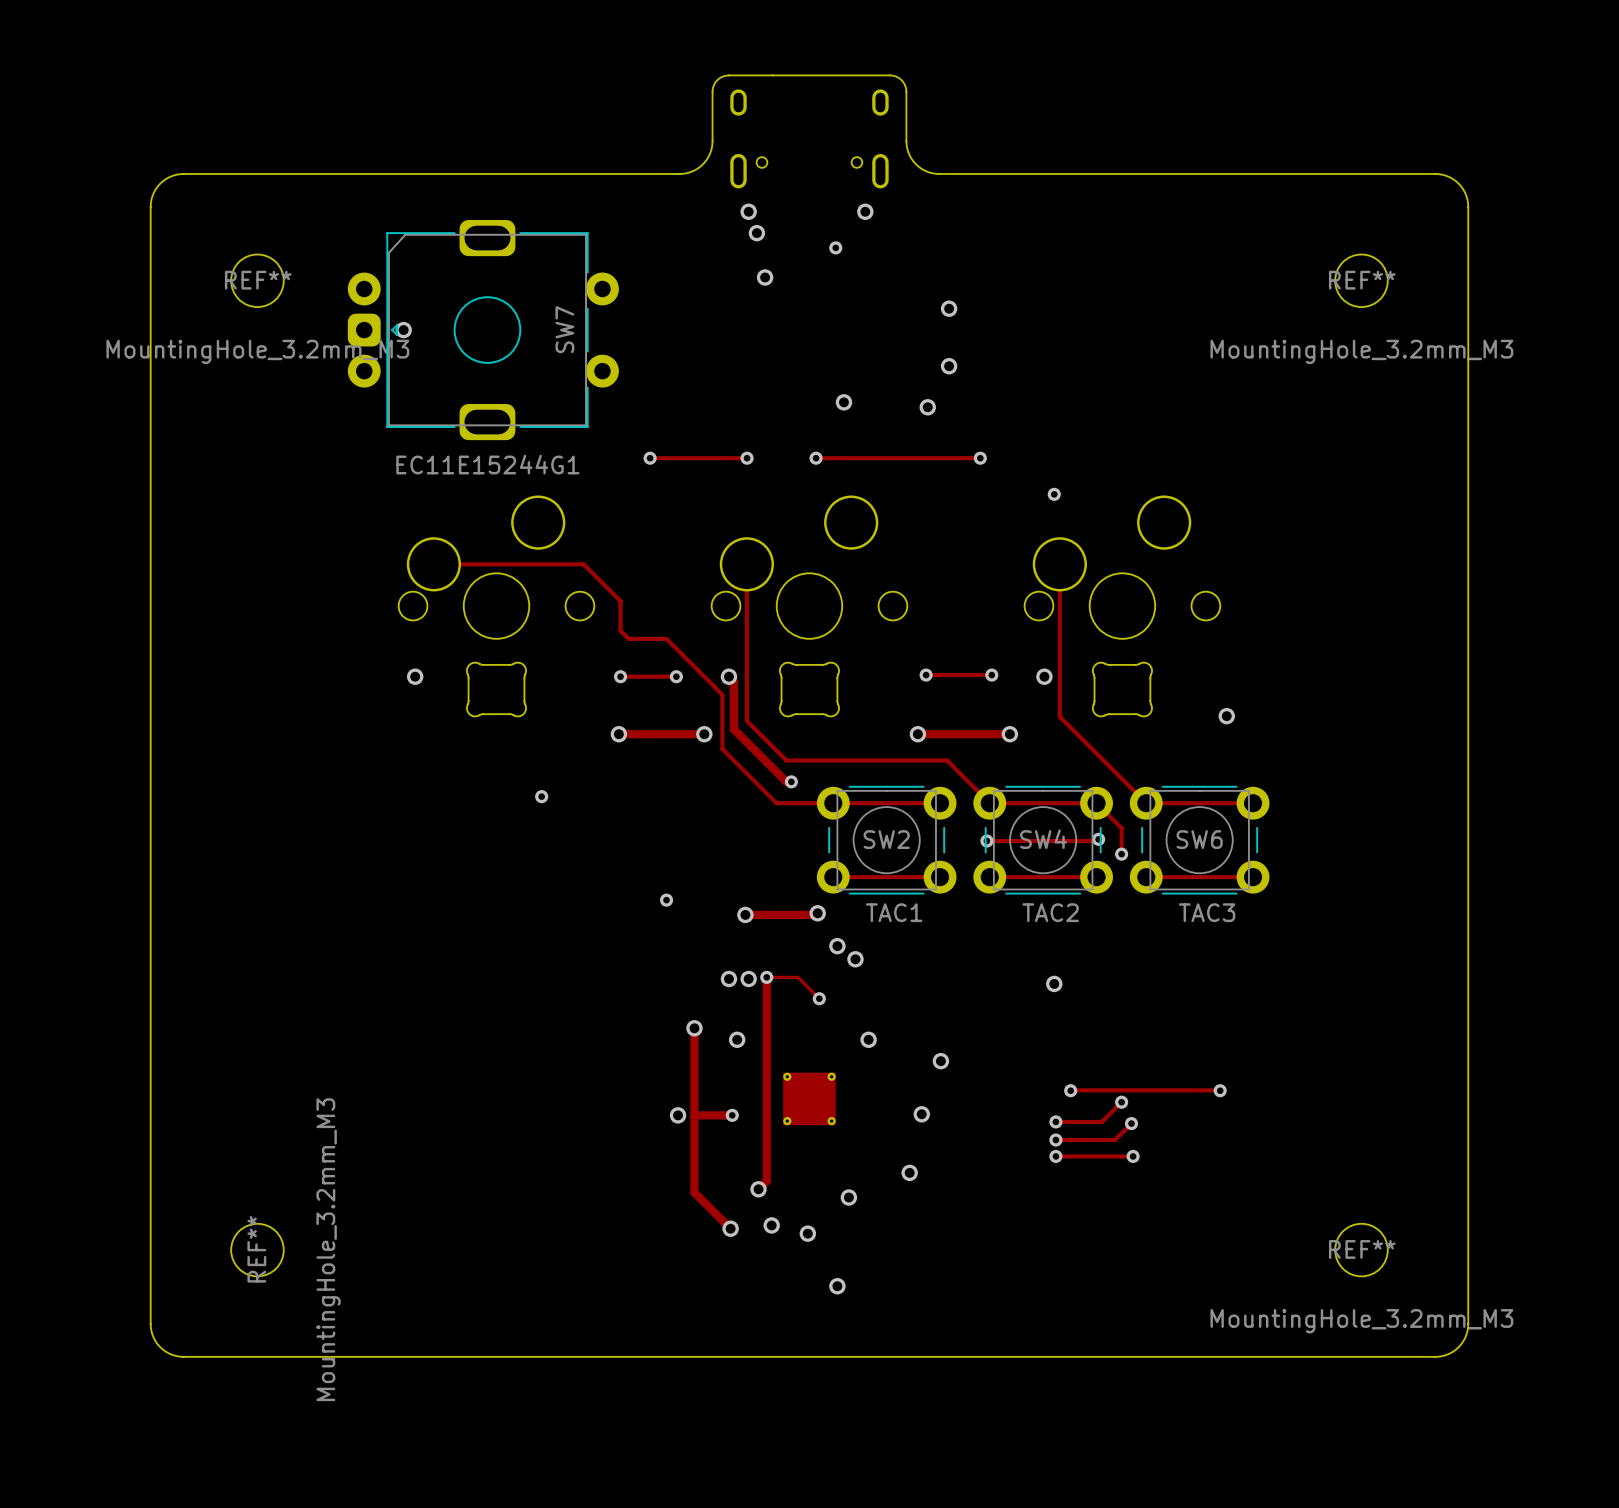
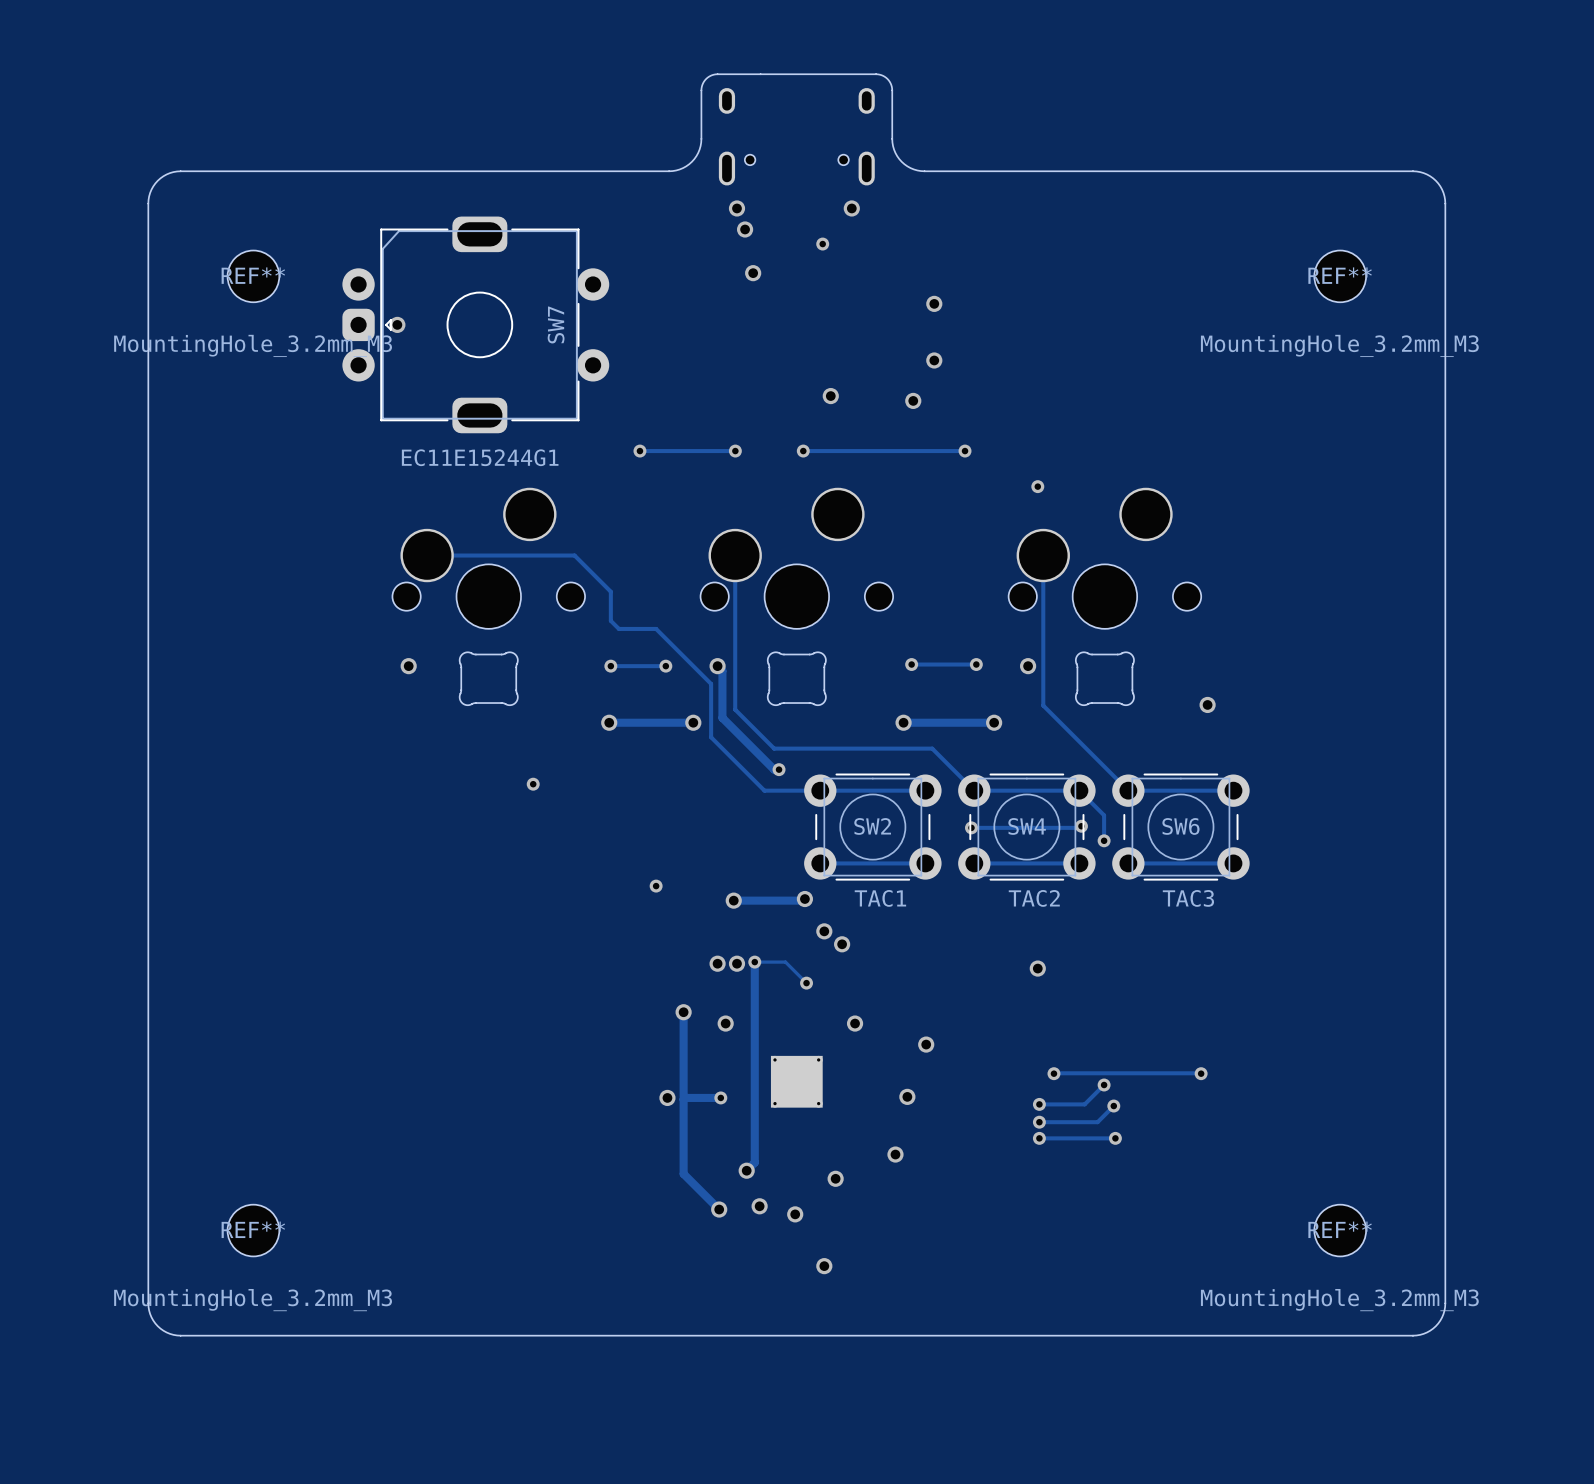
REF** name rotation: 0° (256, 1249) -> 90° clockwise (253, 1229)
REF** value rotation: 0° (328, 1249) -> 90° clockwise (253, 1300)

